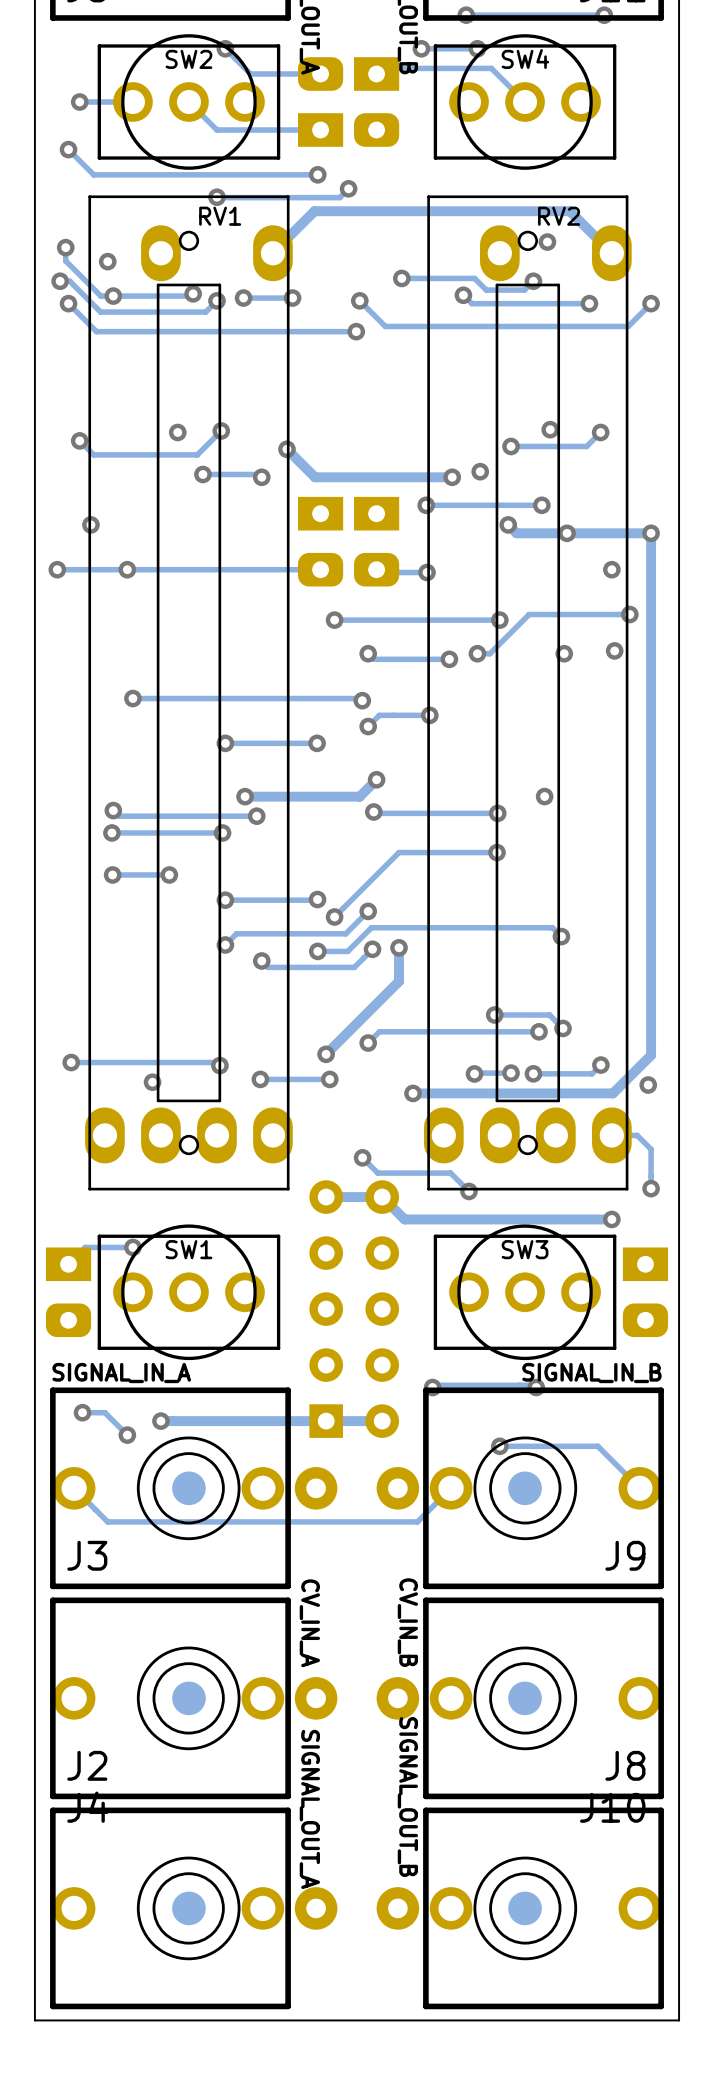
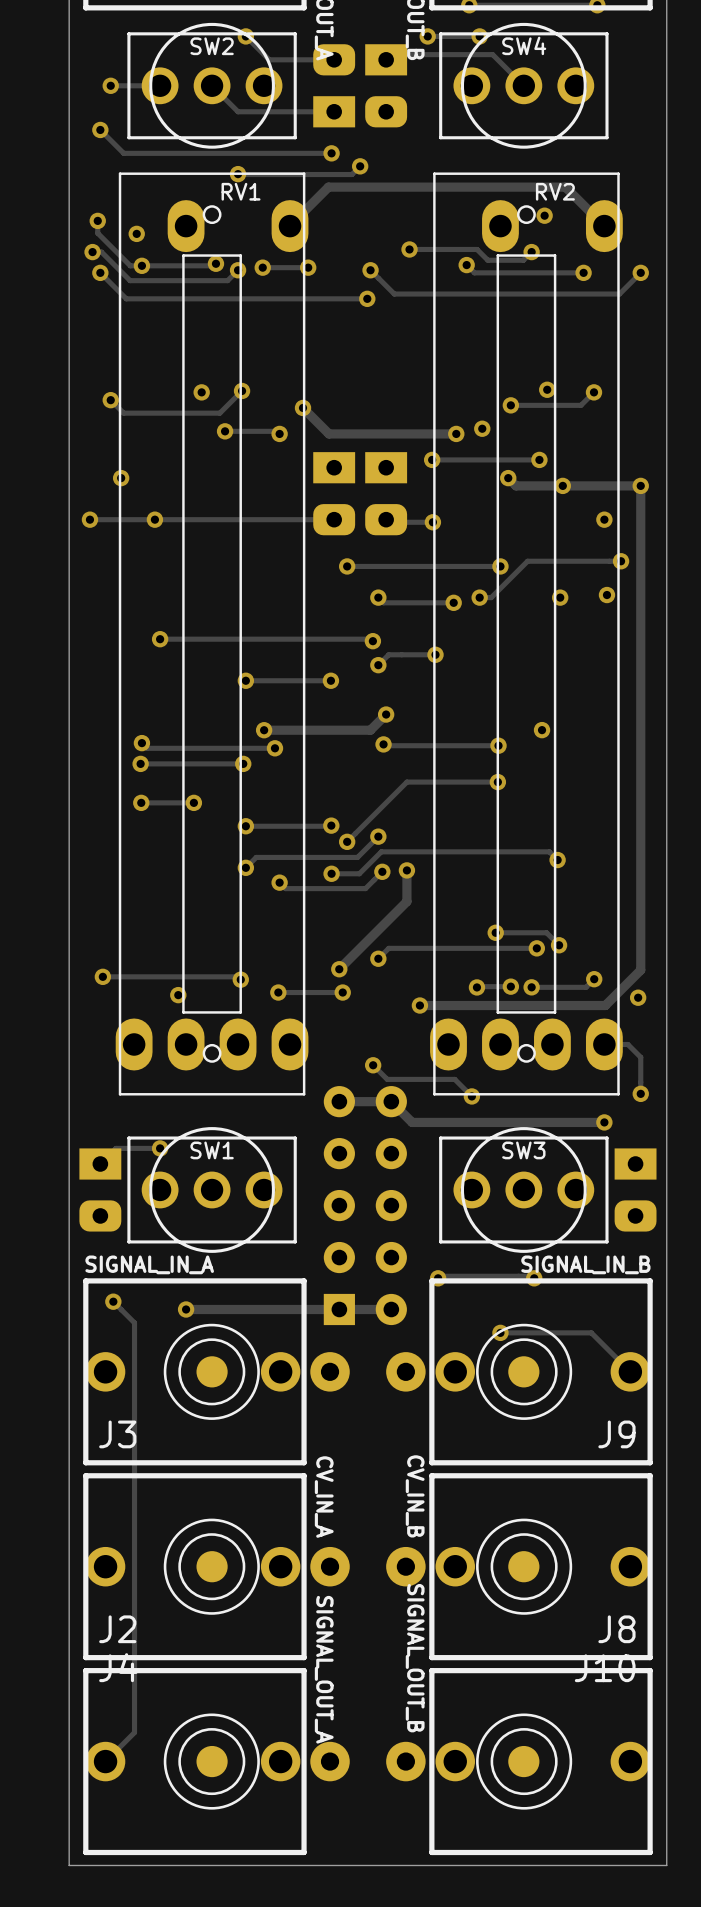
track: (82, 1412) (104, 1412) (127, 1435) -> (113, 1301) (134, 1322) (134, 1732) (105, 1761)
via: (127, 1435) -> none
track: (451, 1488) (417, 1521) (107, 1521) (74, 1488) -> none

